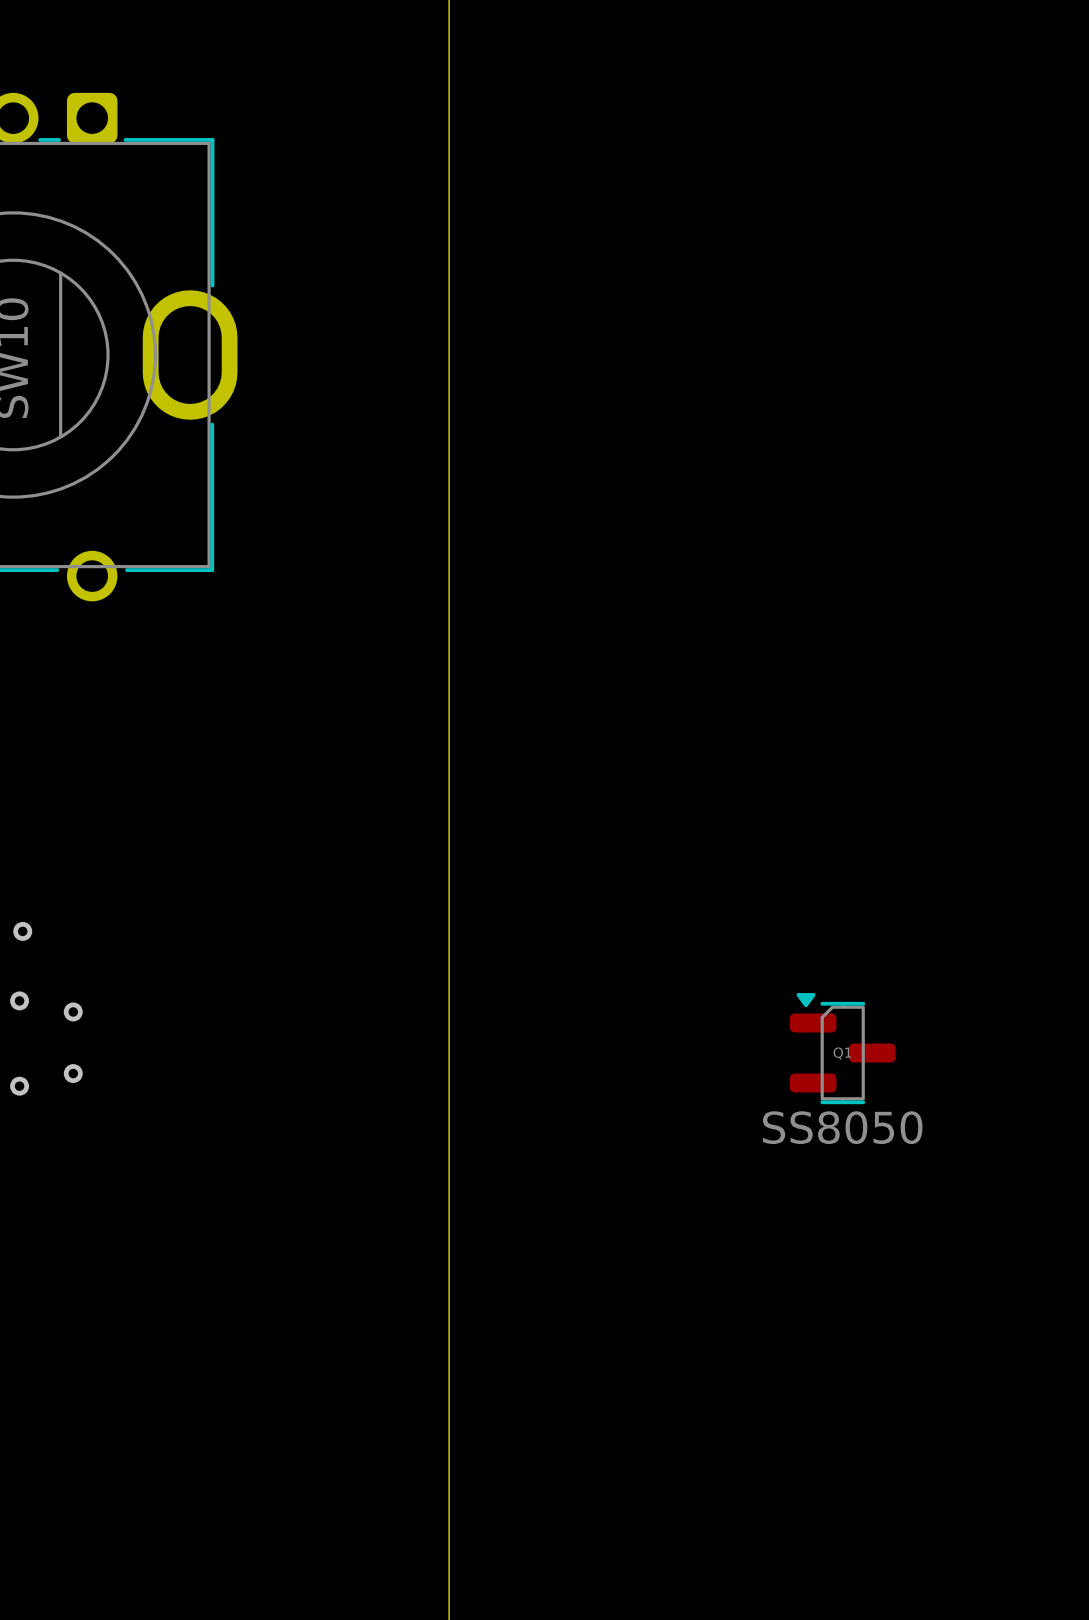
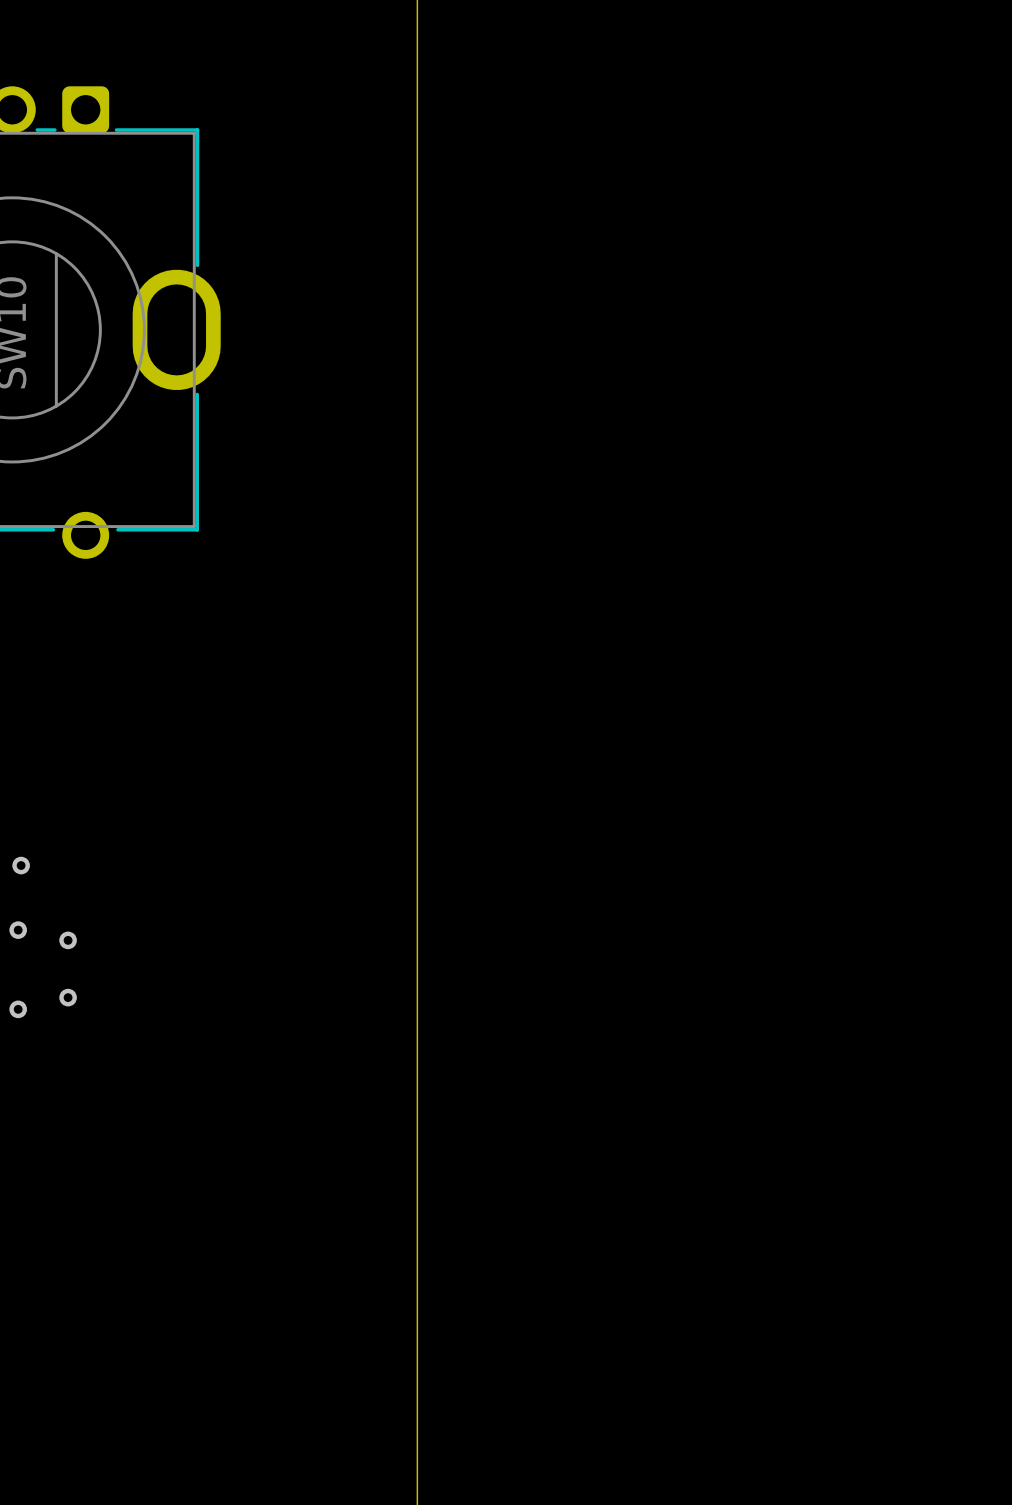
Q1: SS8050 (842, 1048) -> none

